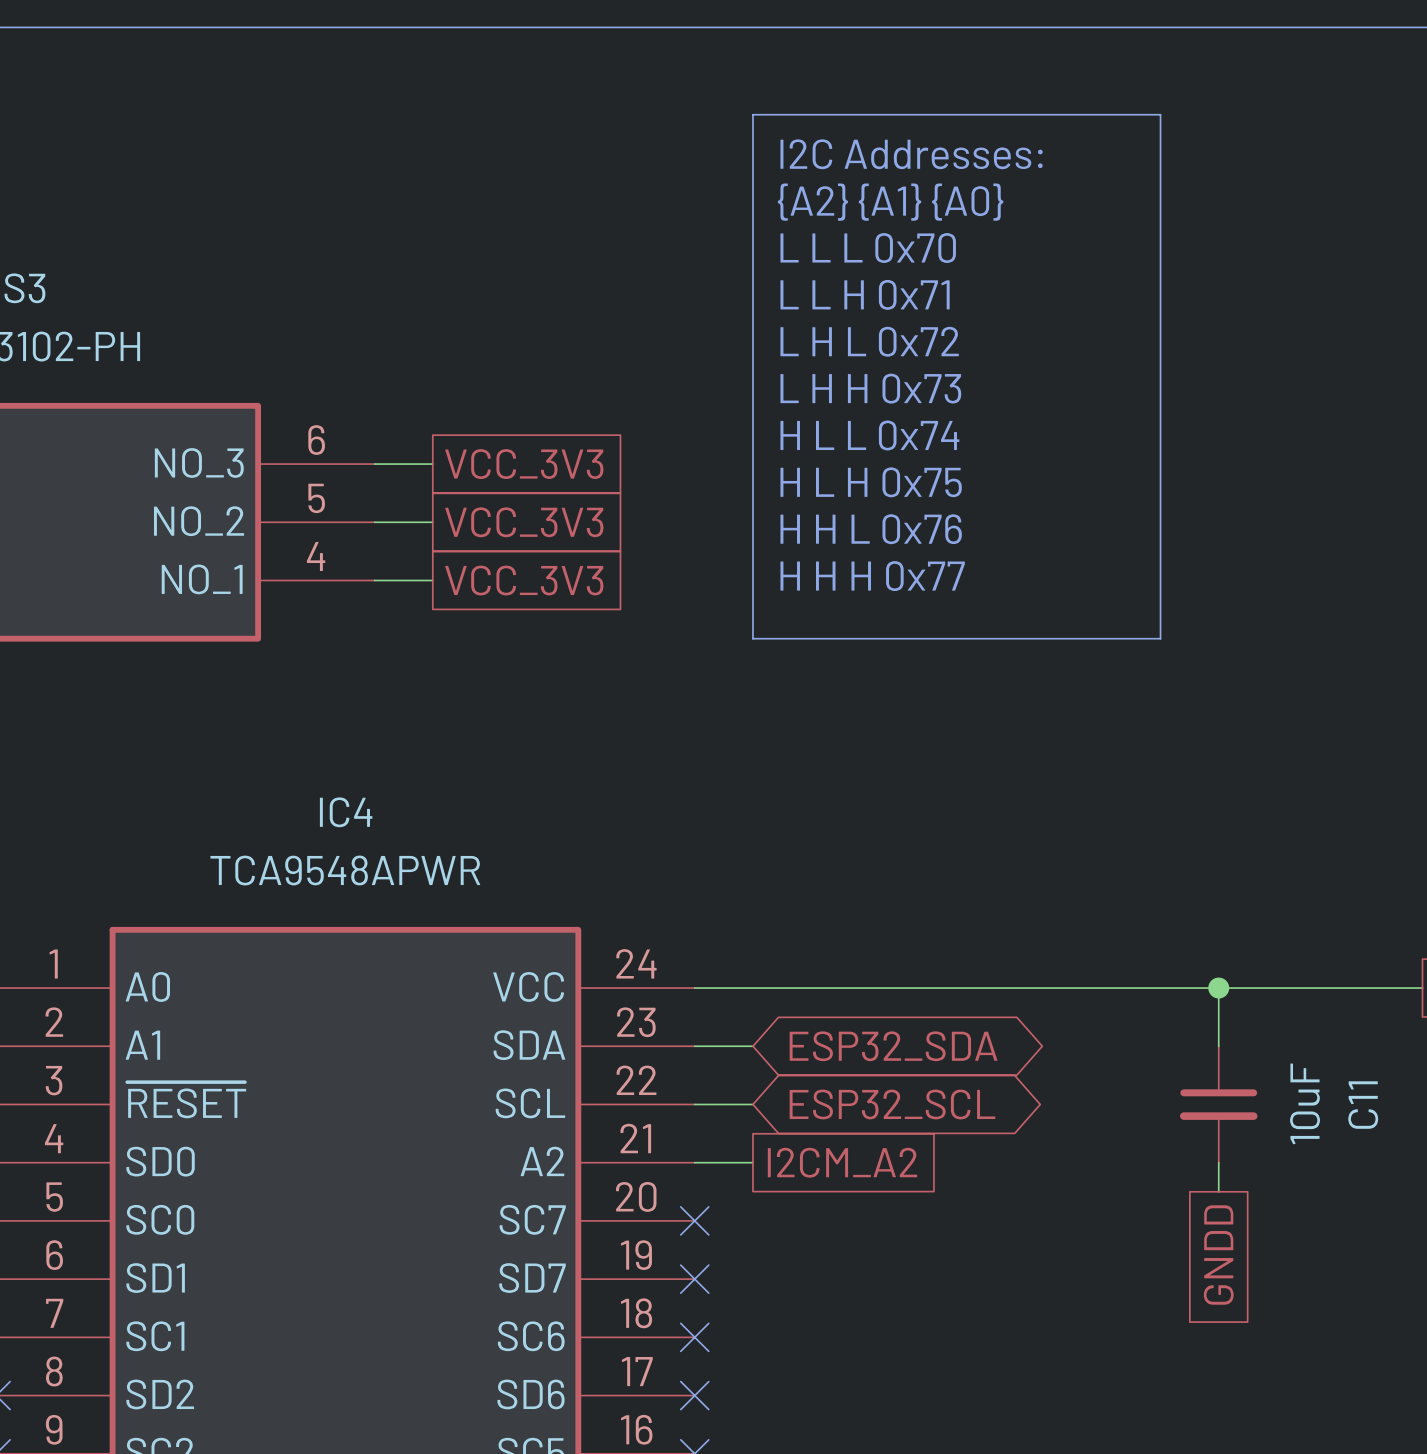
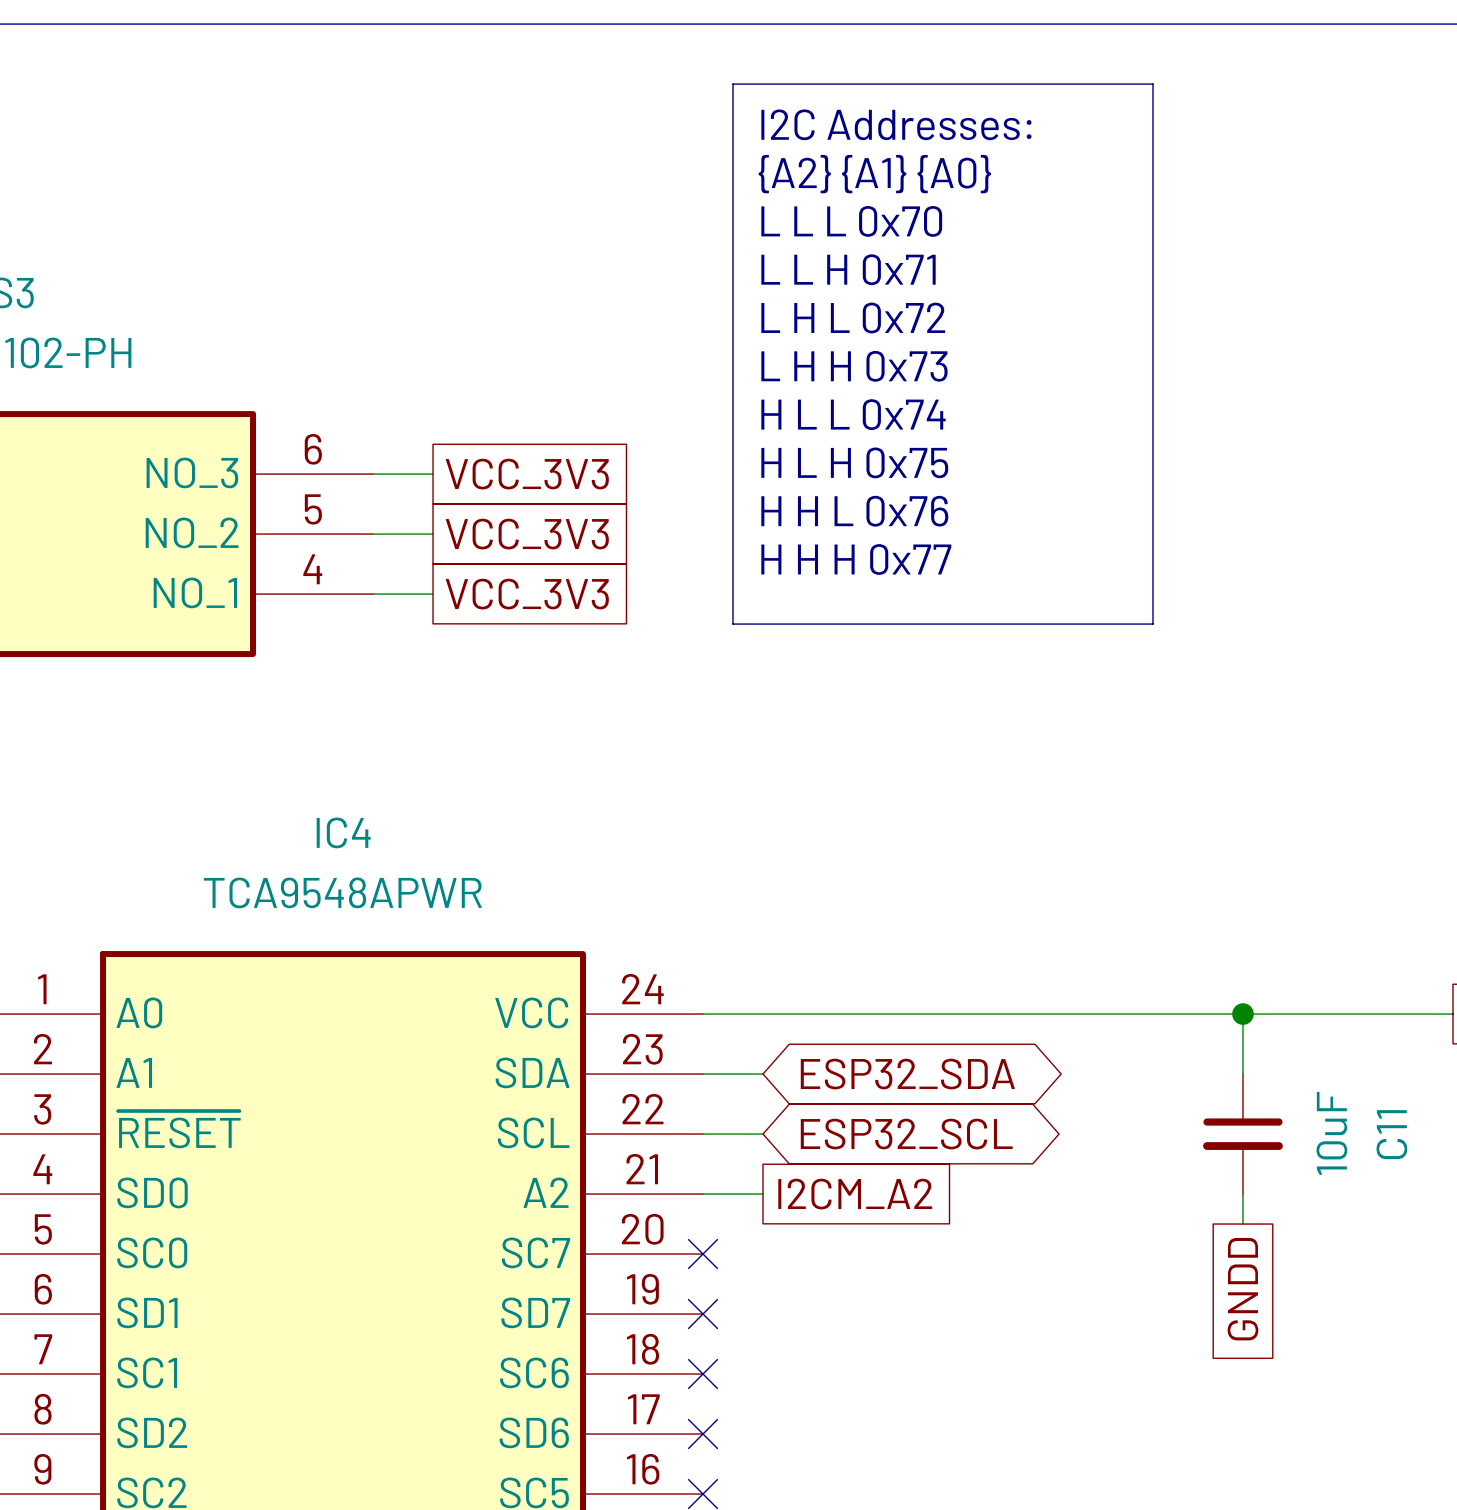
line: (752, 114) (1160, 114) (1160, 638) (752, 638) (752, 114) -> (733, 84) (1152, 84) (1152, 624) (733, 624) (733, 84)
text position: I2C Addresses: (911, 154) -> I2C Addresses: (896, 124)
text position: {A2} {A1} {A0} (890, 202) -> {A2} {A1} {A0} (874, 174)
text position: L L L 0x70 (868, 248) -> L L L 0x70 (851, 221)
text position: L L H 0x71 (865, 294) -> L L H 0x71 (848, 269)
text position: L H L 0x72 (869, 341) -> L H L 0x72 (853, 318)
text position: L H H 0x73 (870, 388) -> L H H 0x73 (854, 366)
text position: H L L 0x74 (869, 435) -> H L L 0x74 (853, 414)
text position: H L H 0x75 (871, 482) -> H L H 0x75 (854, 462)
text position: H H L 0x76 (871, 529) -> H H L 0x76 (854, 511)
text position: H H H 0x77 (872, 576) -> H H H 0x77 (856, 559)

